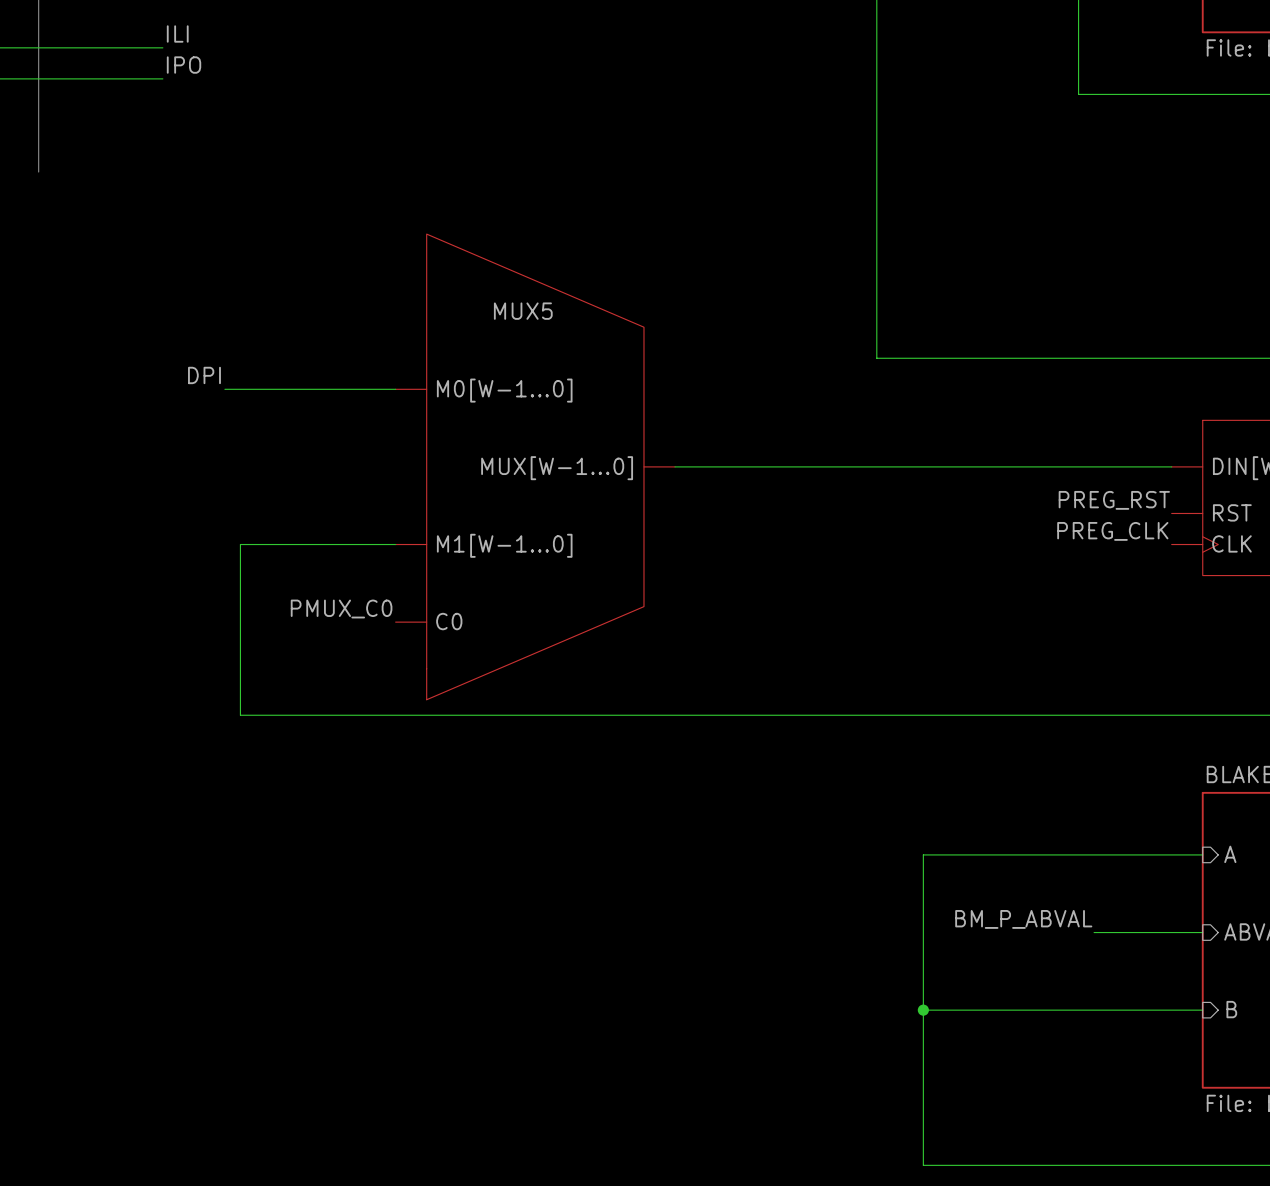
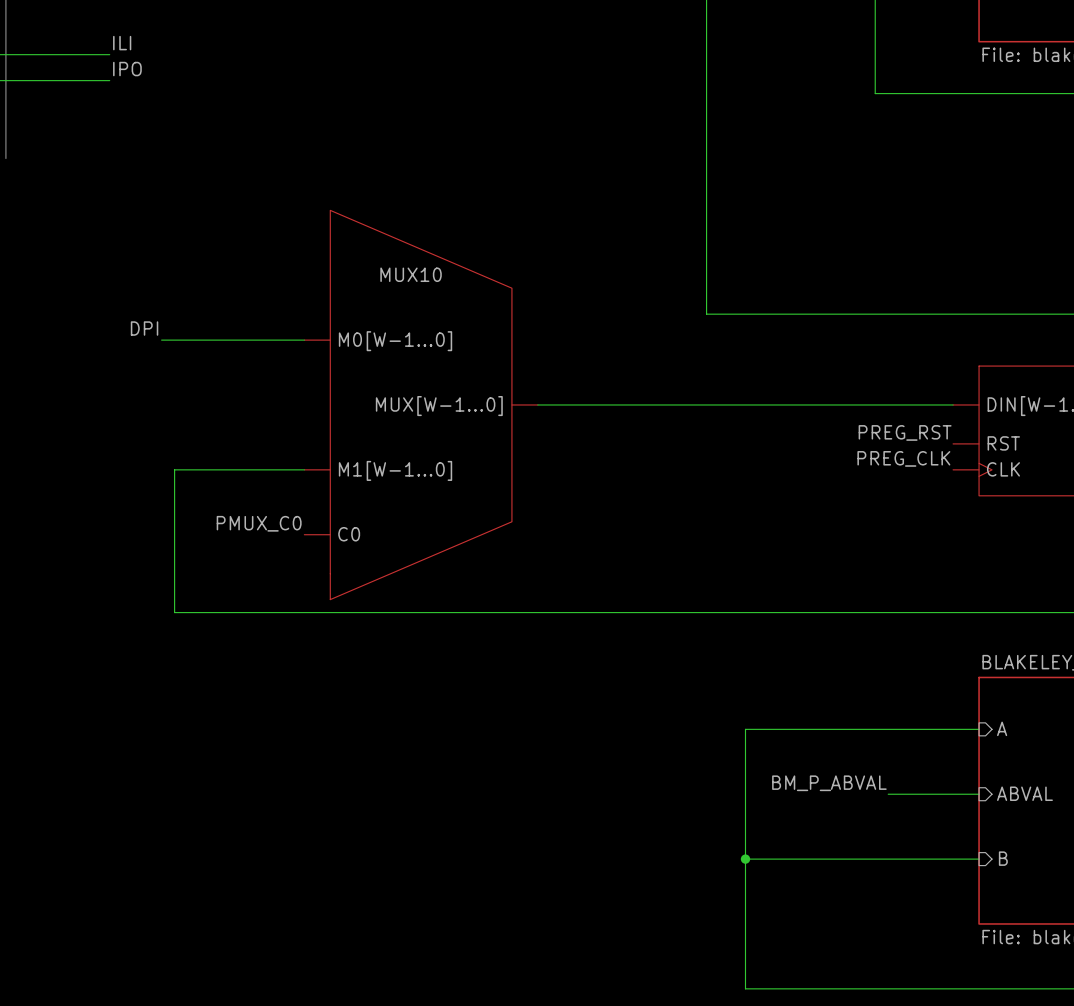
MUX5 name: MUX5 (523, 311) -> MUX10 (411, 274)

